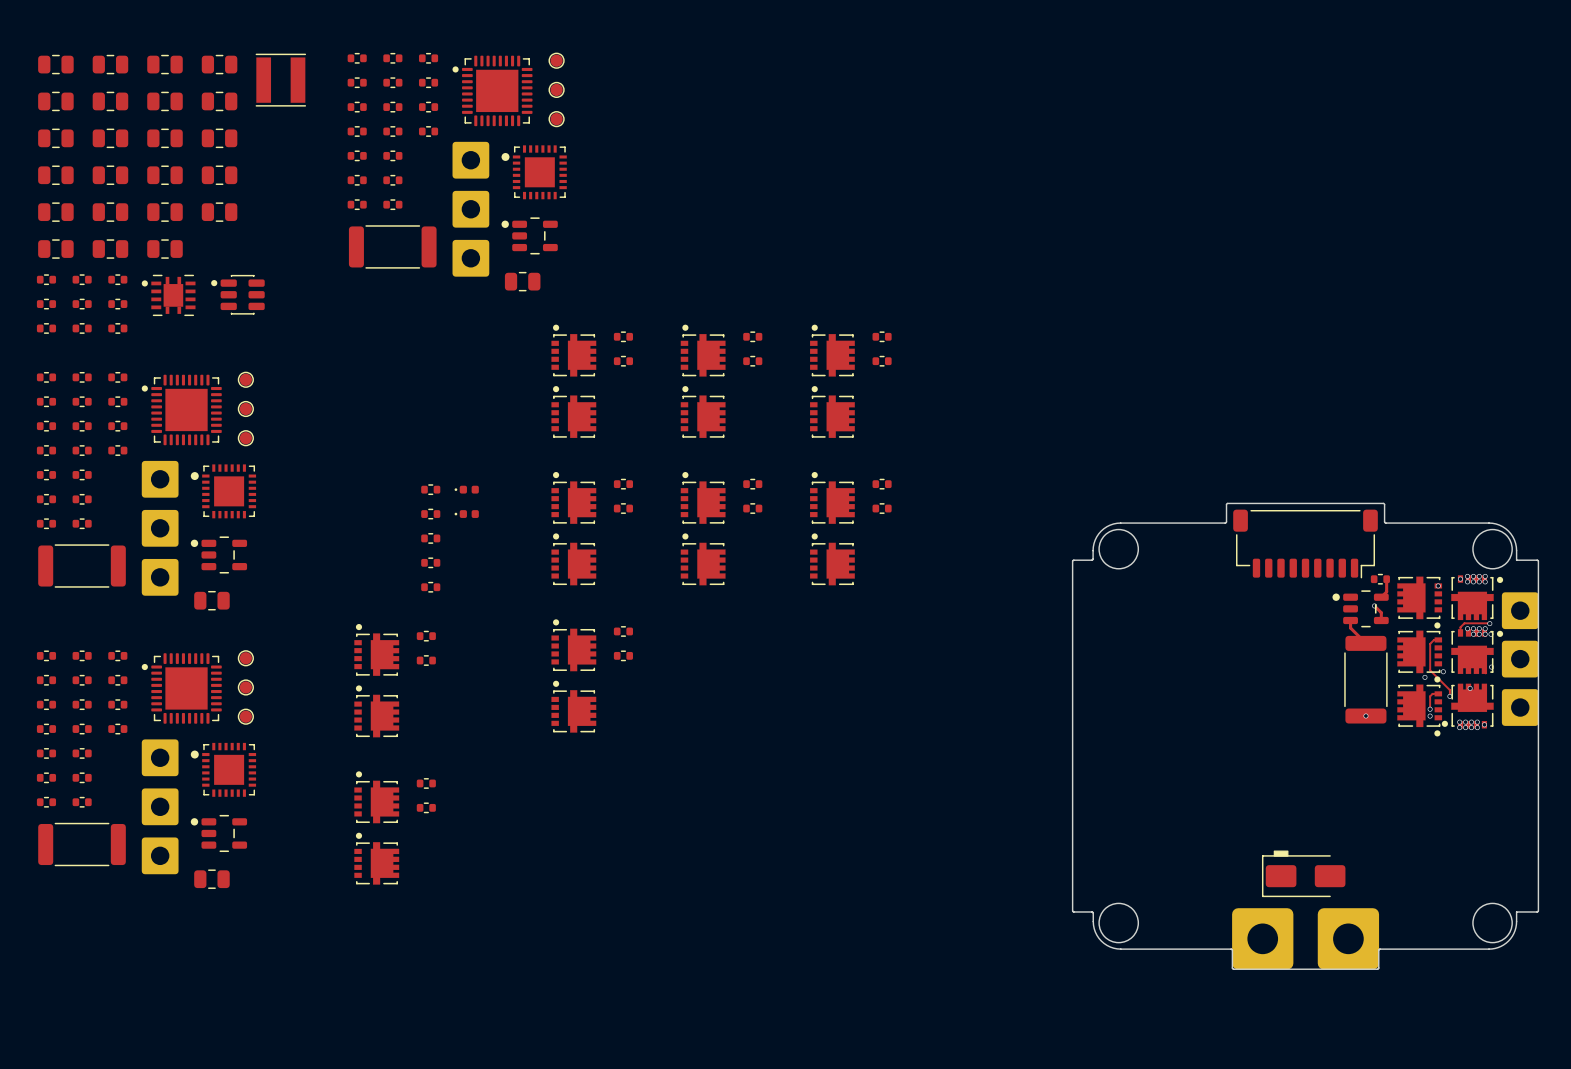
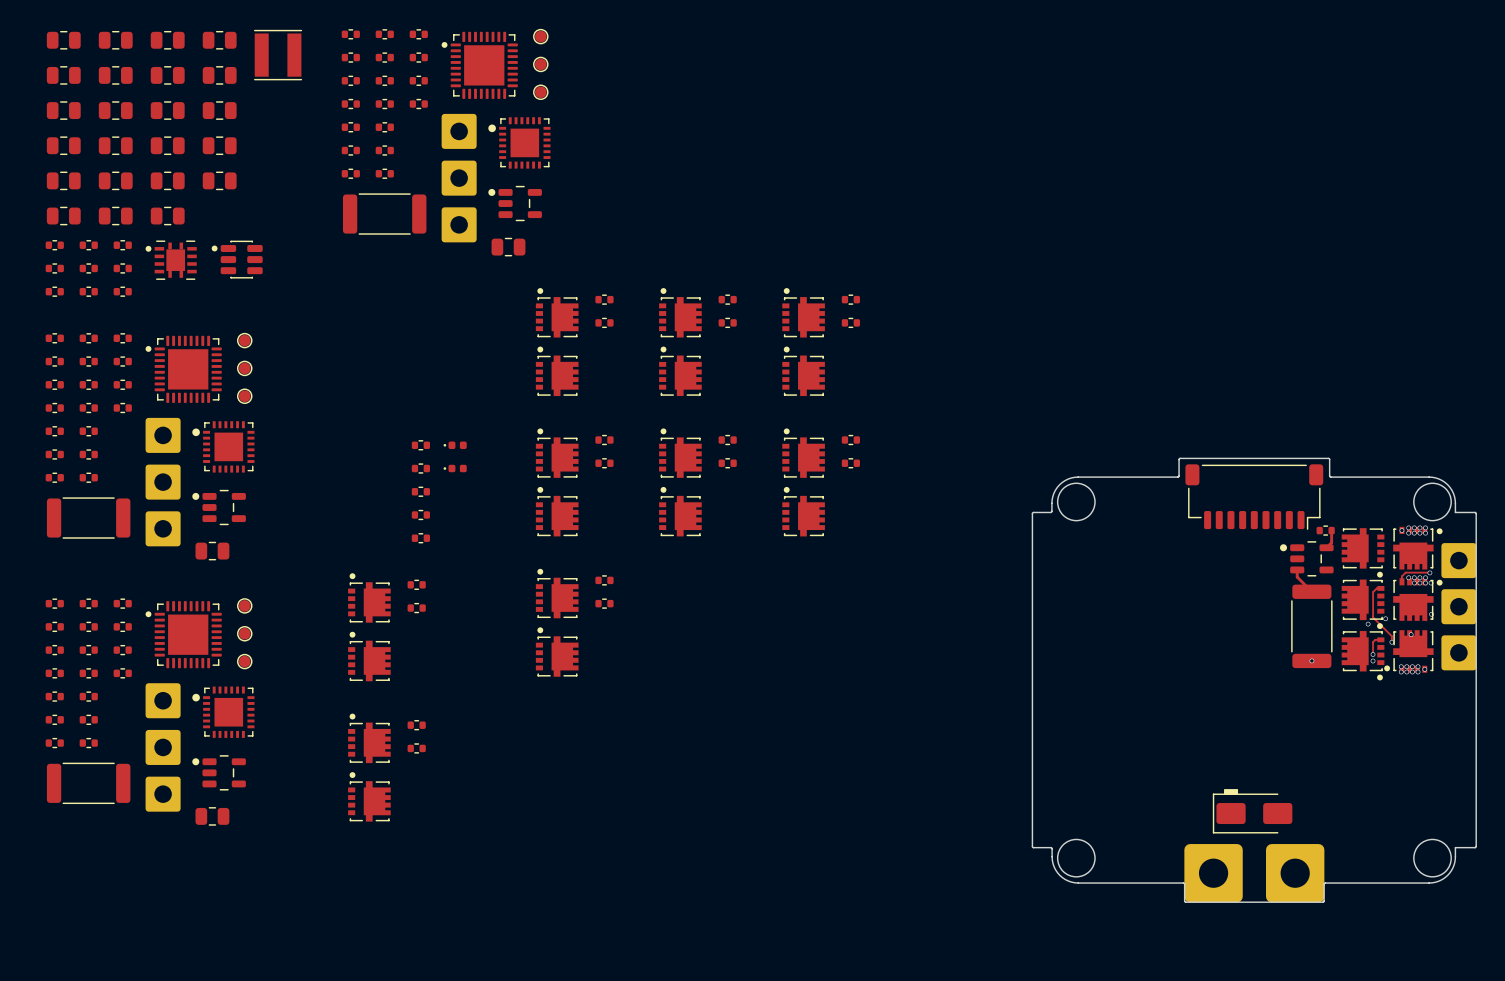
via: (1438, 585) -> none
track: (1374, 605) (1381, 612) (1381, 620) -> none
via: (1374, 605) -> none

